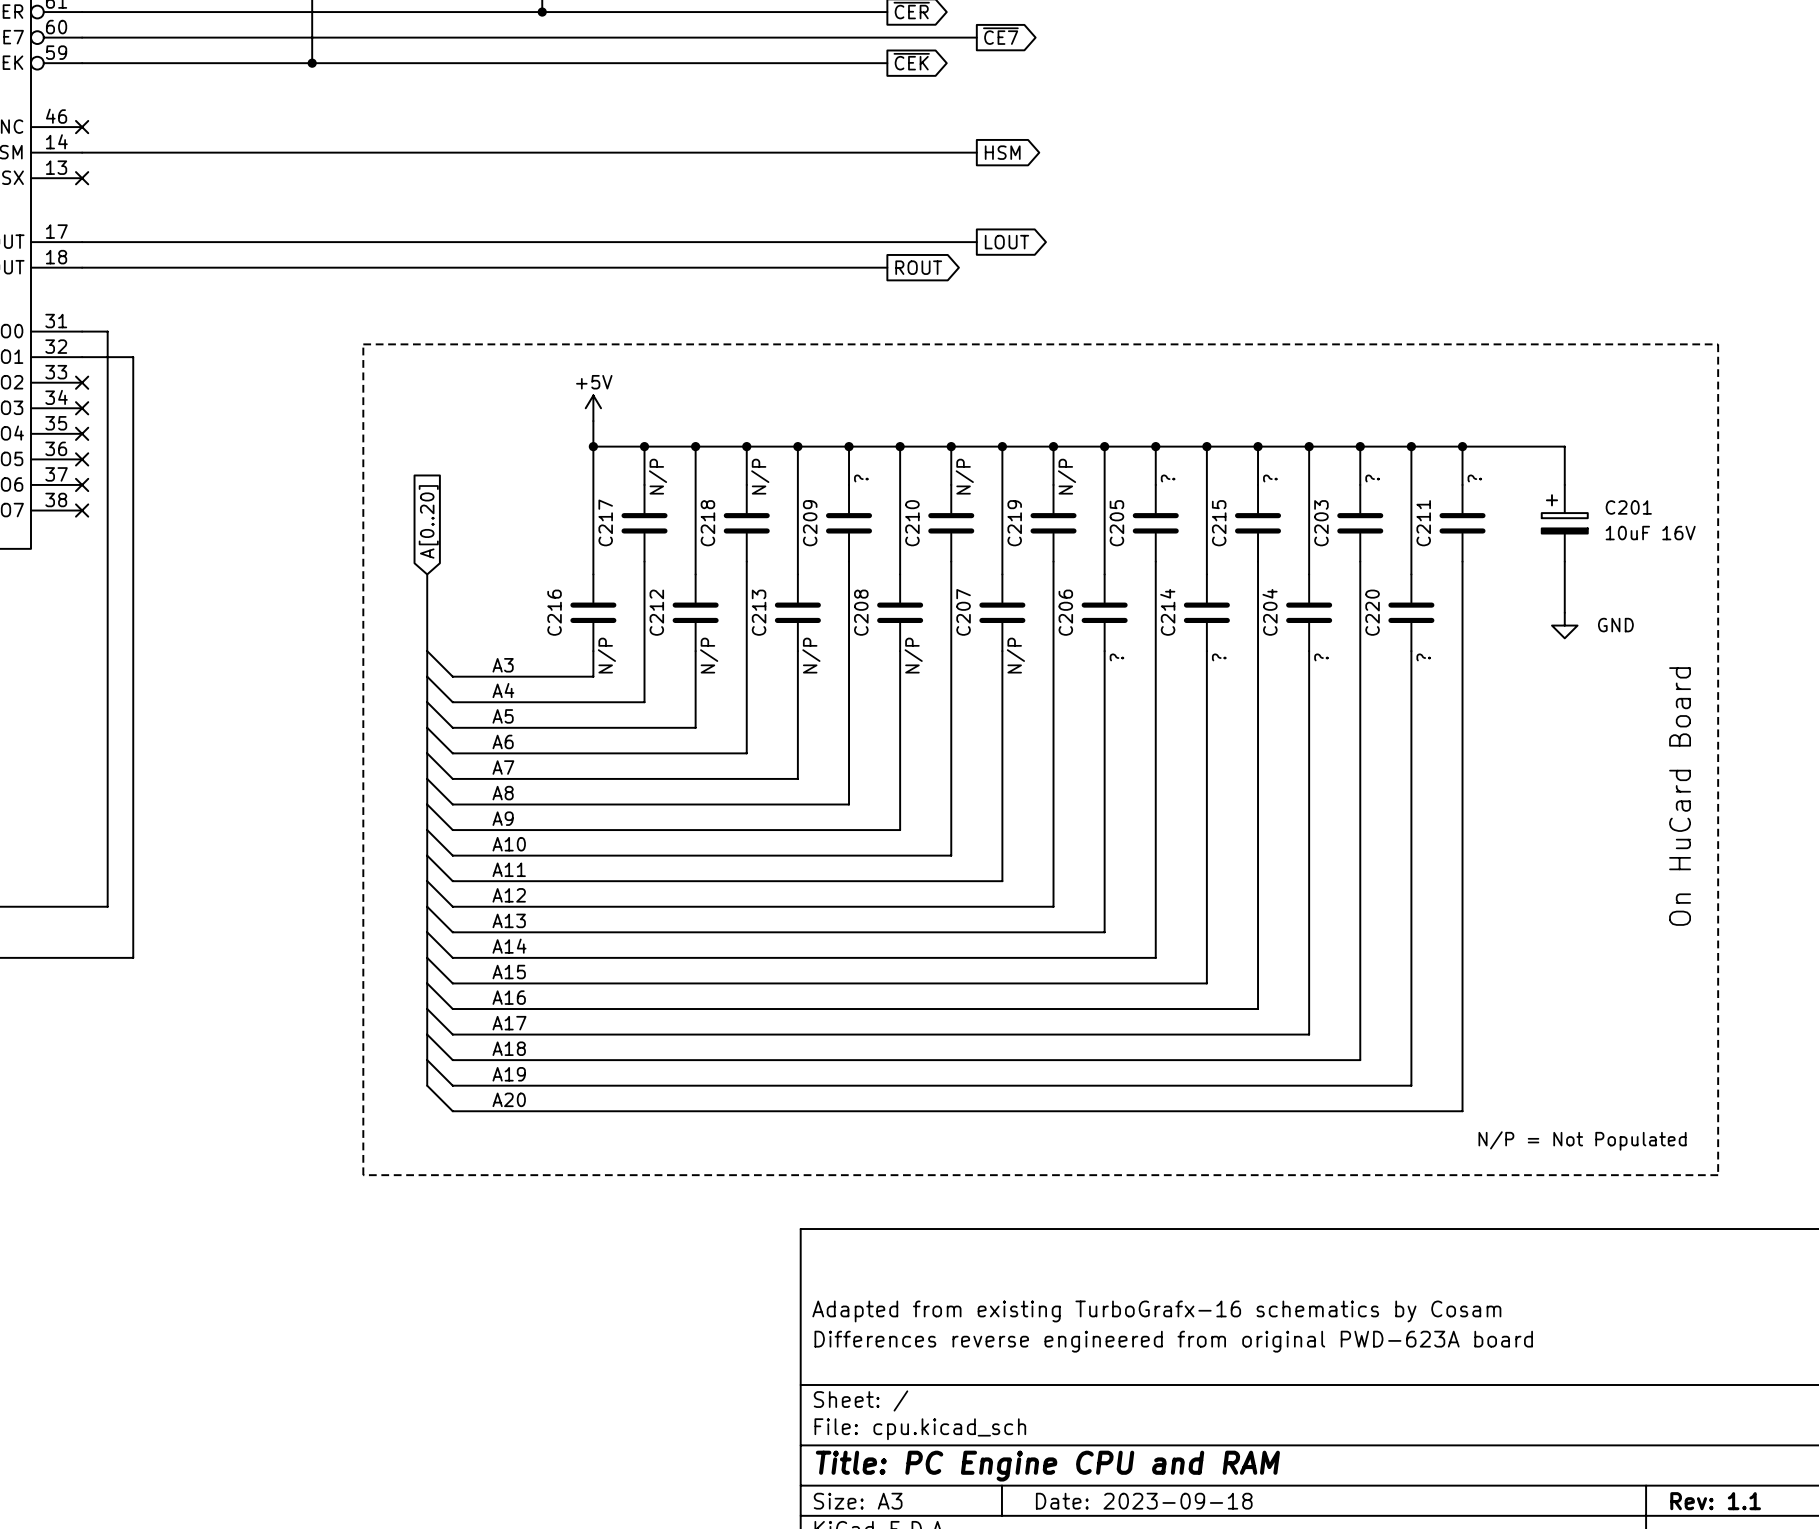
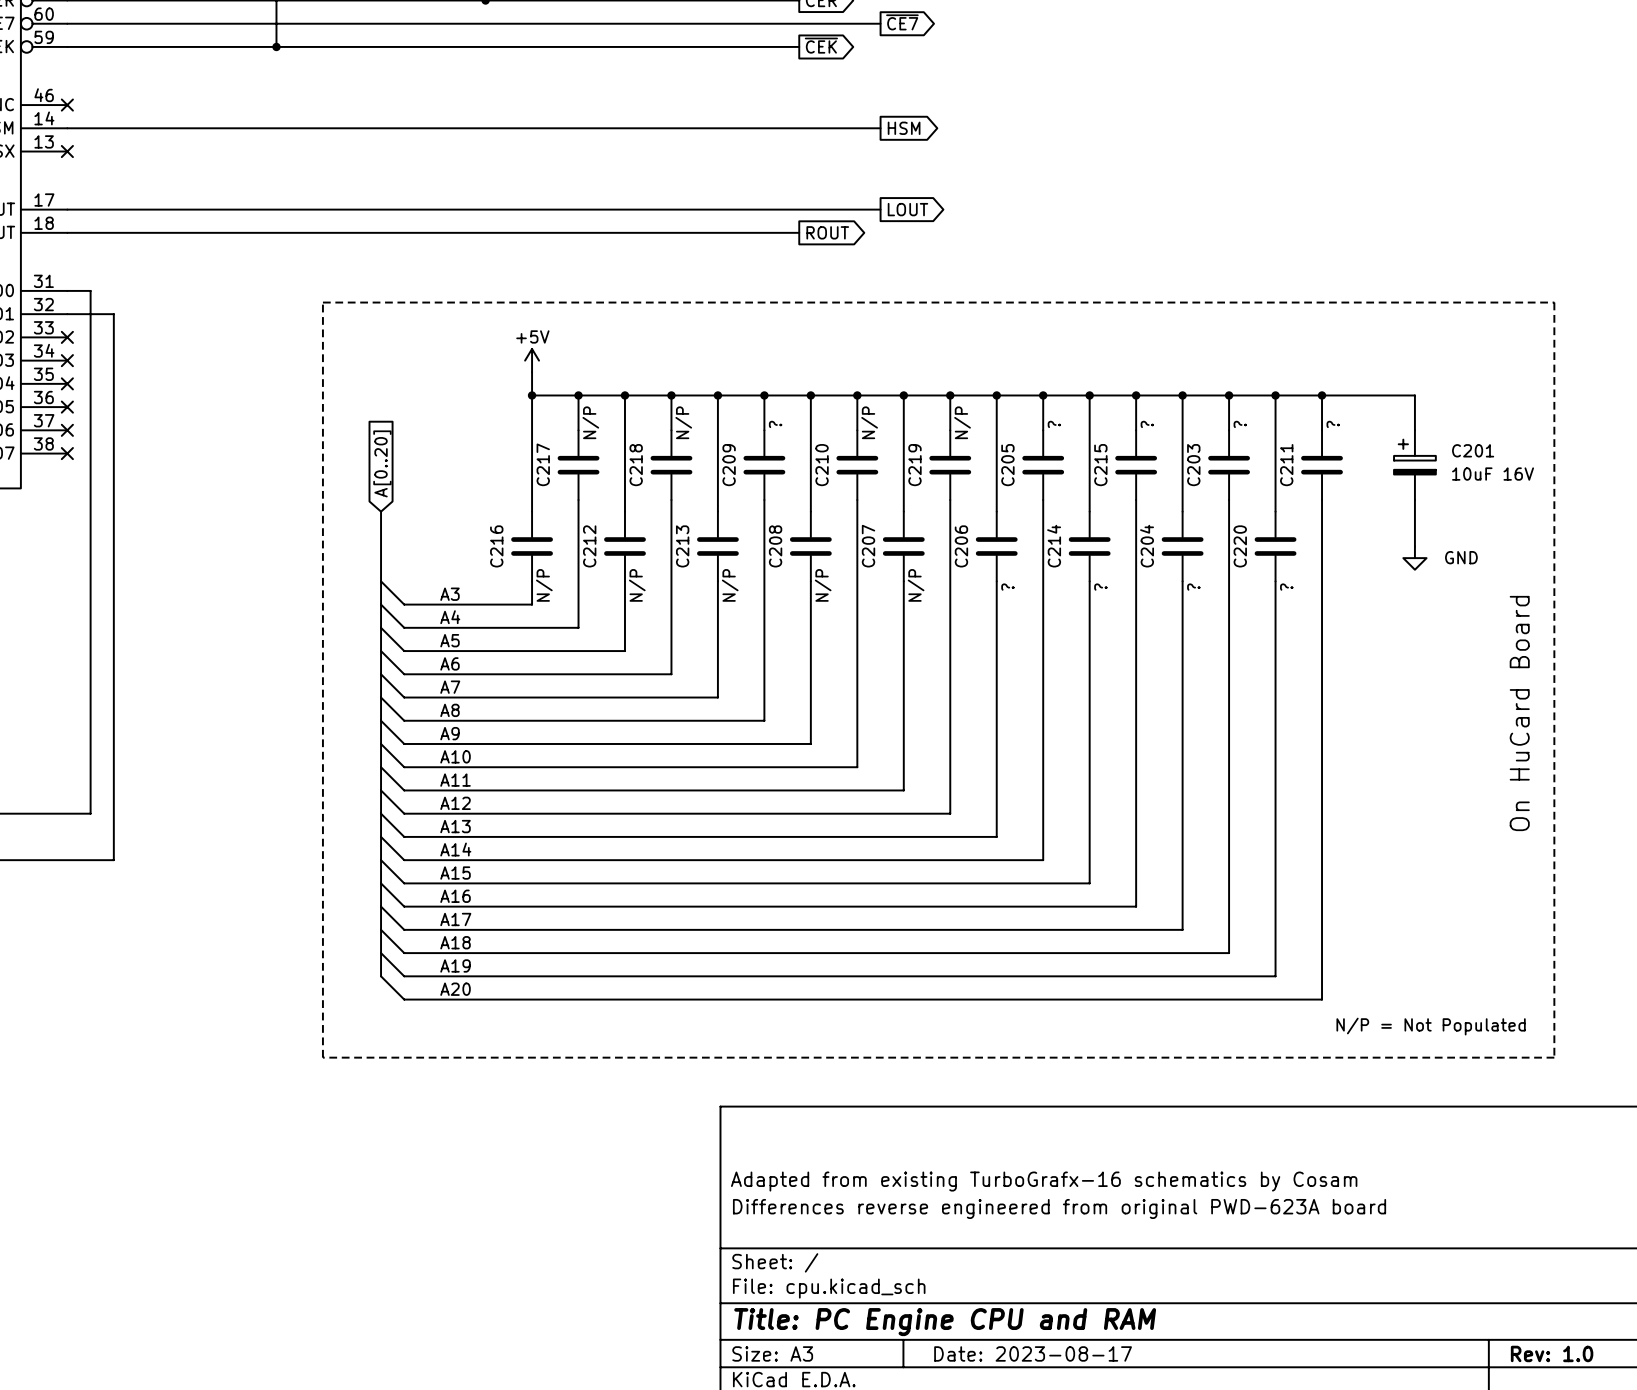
title block: Date: 2023-09-18 (1144, 1501) -> Date: 2023-08-17 (1033, 1353)
title block: Rev: 1.1 (1715, 1501) -> Rev: 1.0 (1552, 1353)

